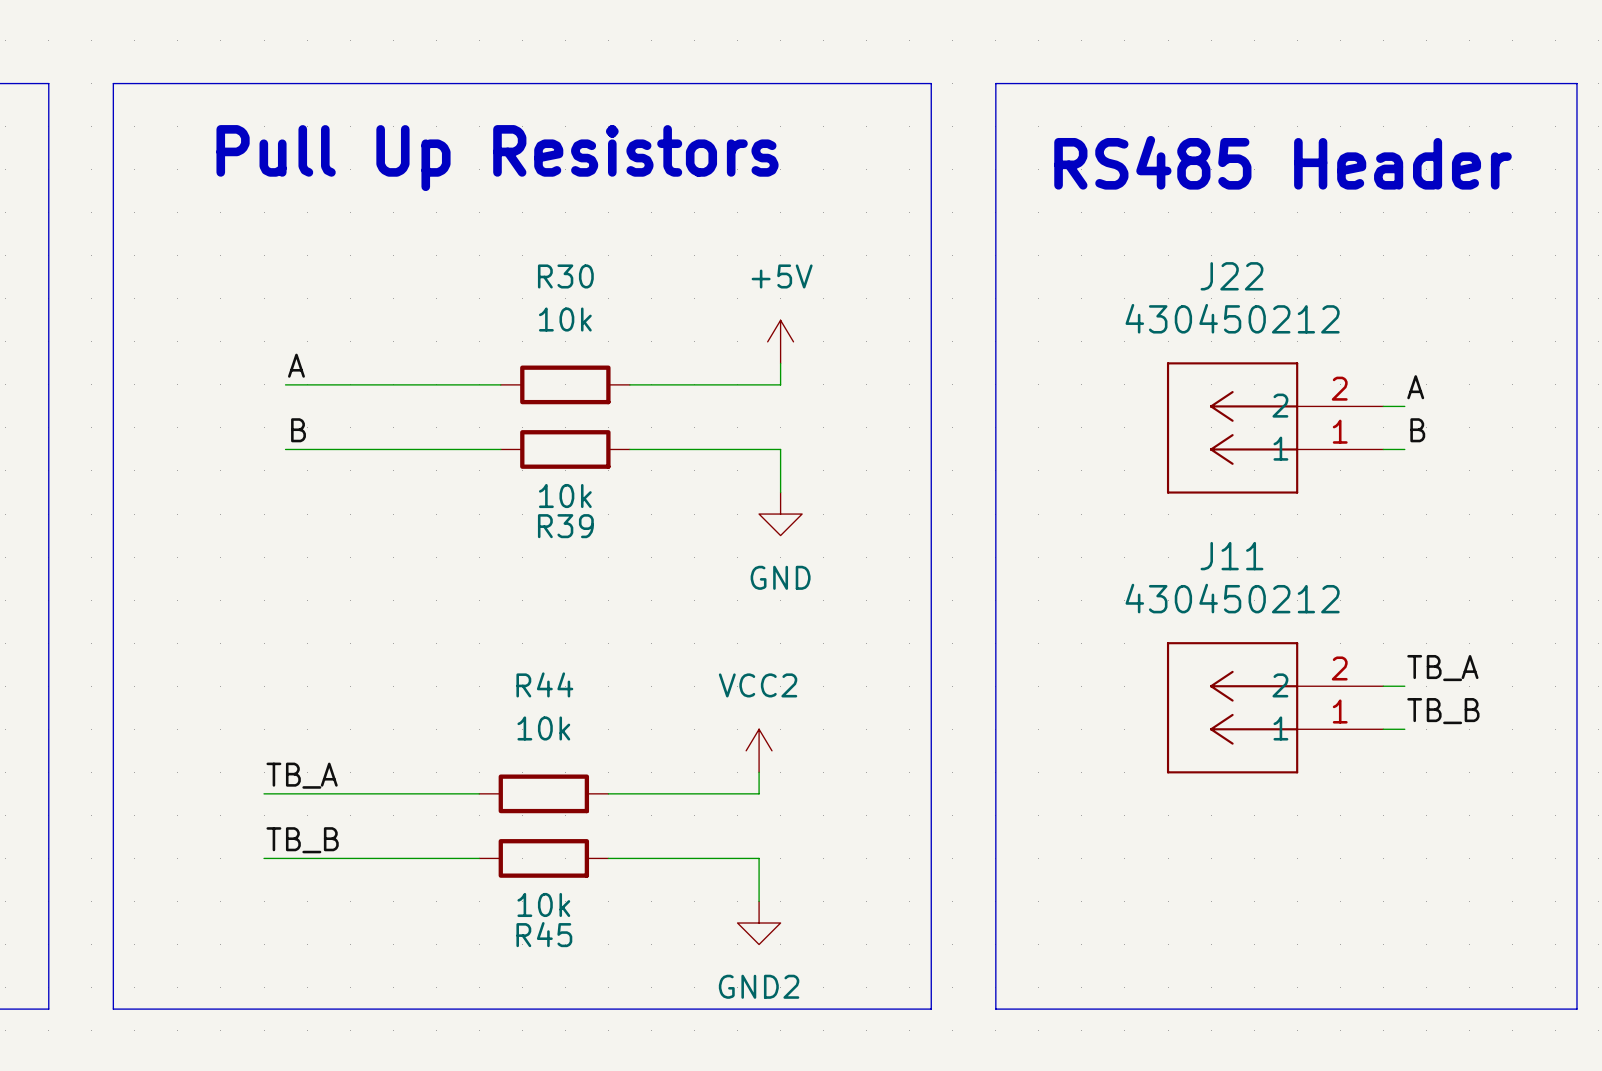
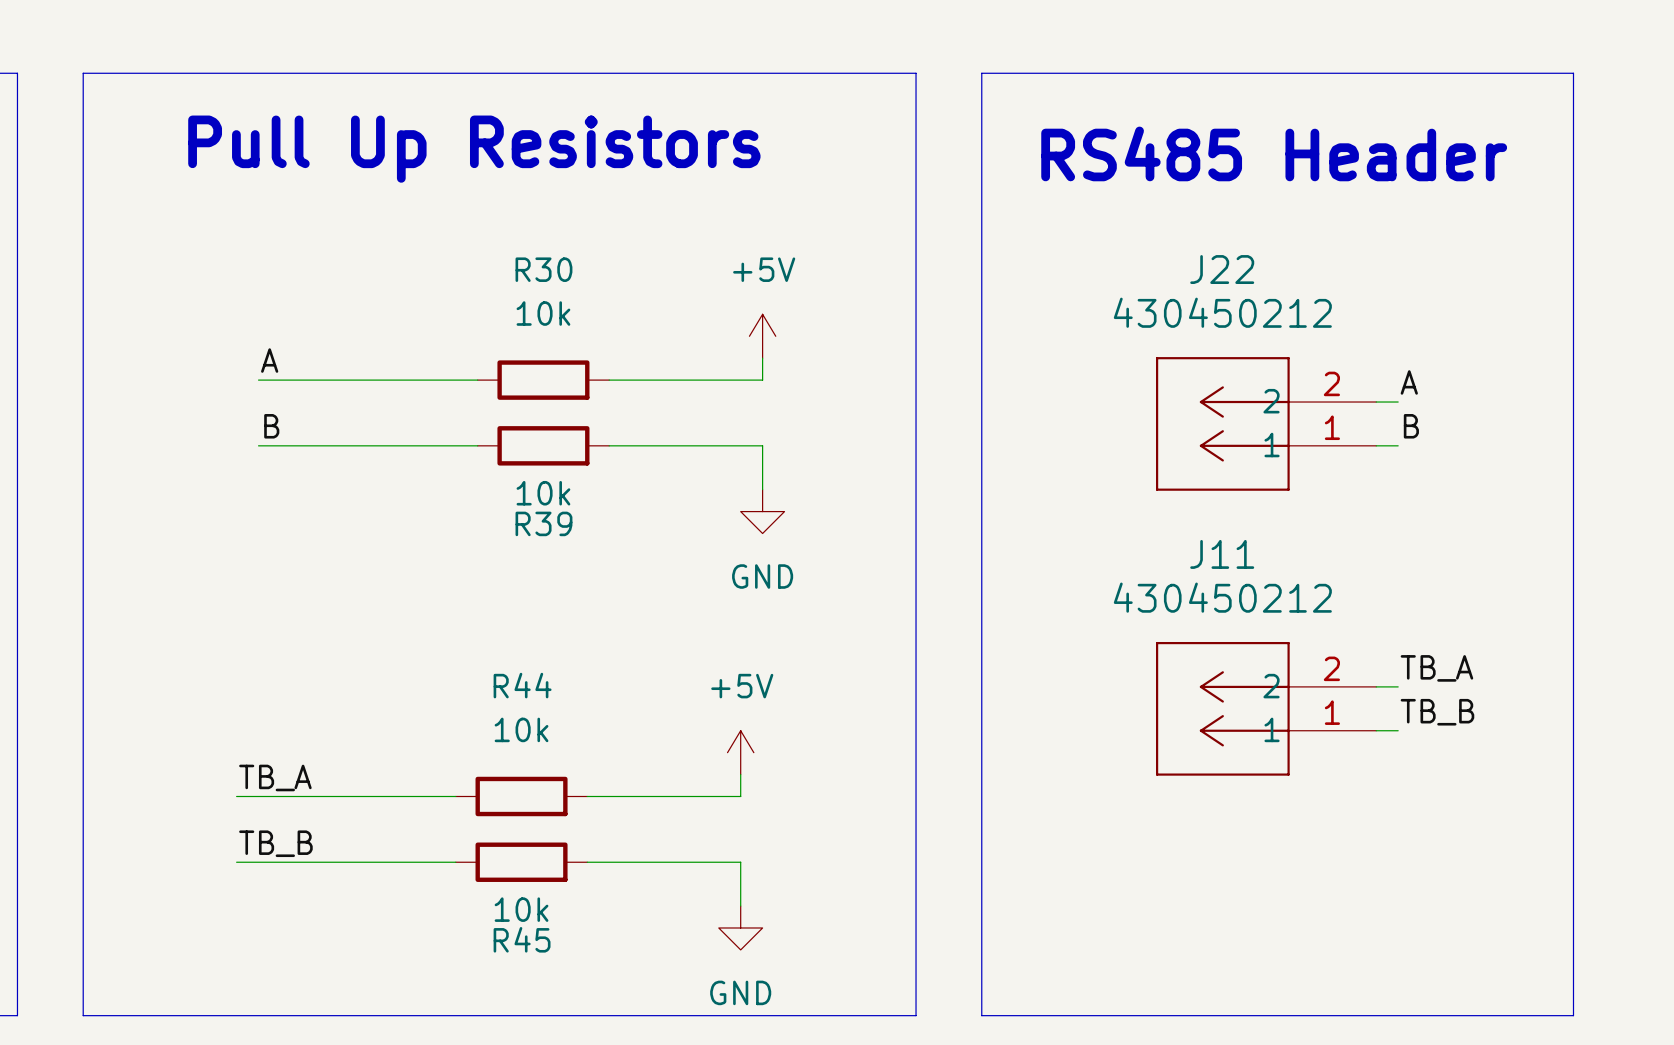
power symbol: VCC2 (759, 750) -> +5V (740, 752)
power symbol: GND2 (759, 923) -> GND (740, 927)

